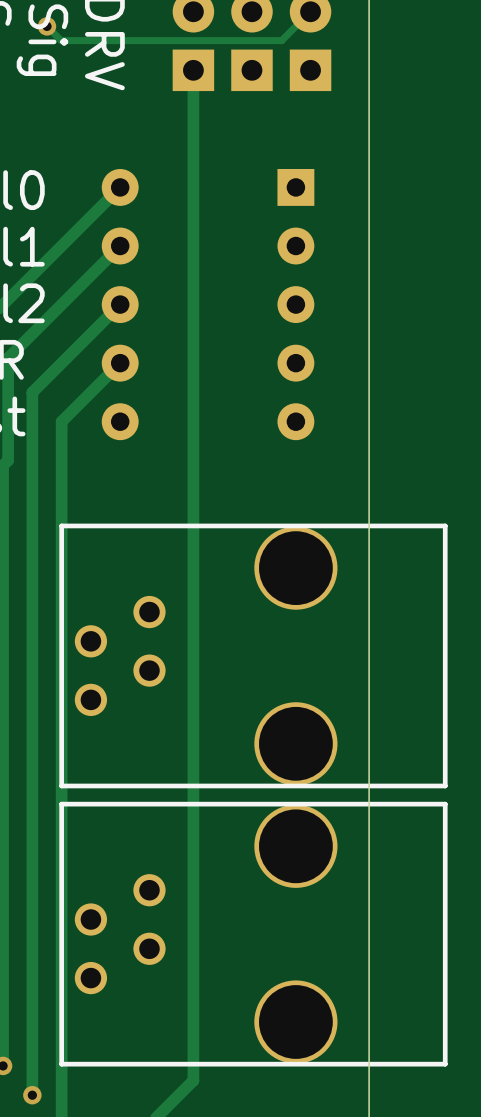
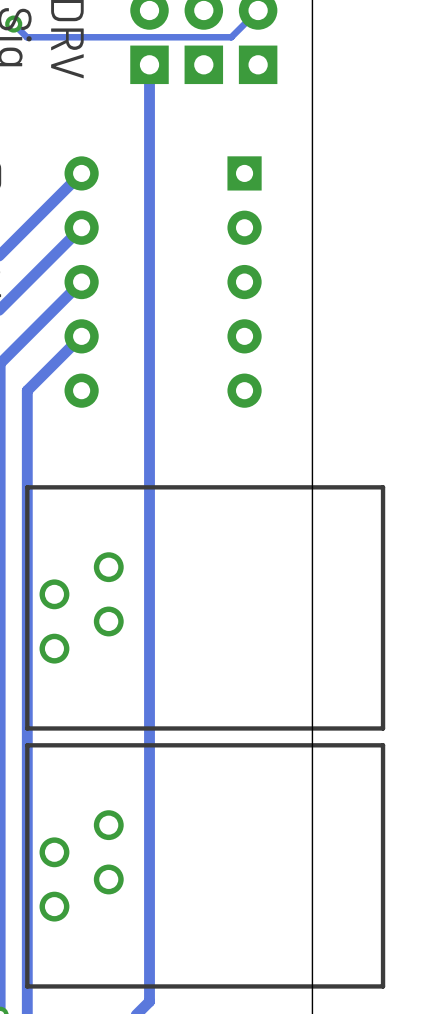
part footprint: [59, 523, 448, 789] -> [25, 485, 386, 731]
part footprint: [59, 801, 448, 1067] -> [25, 743, 386, 989]

